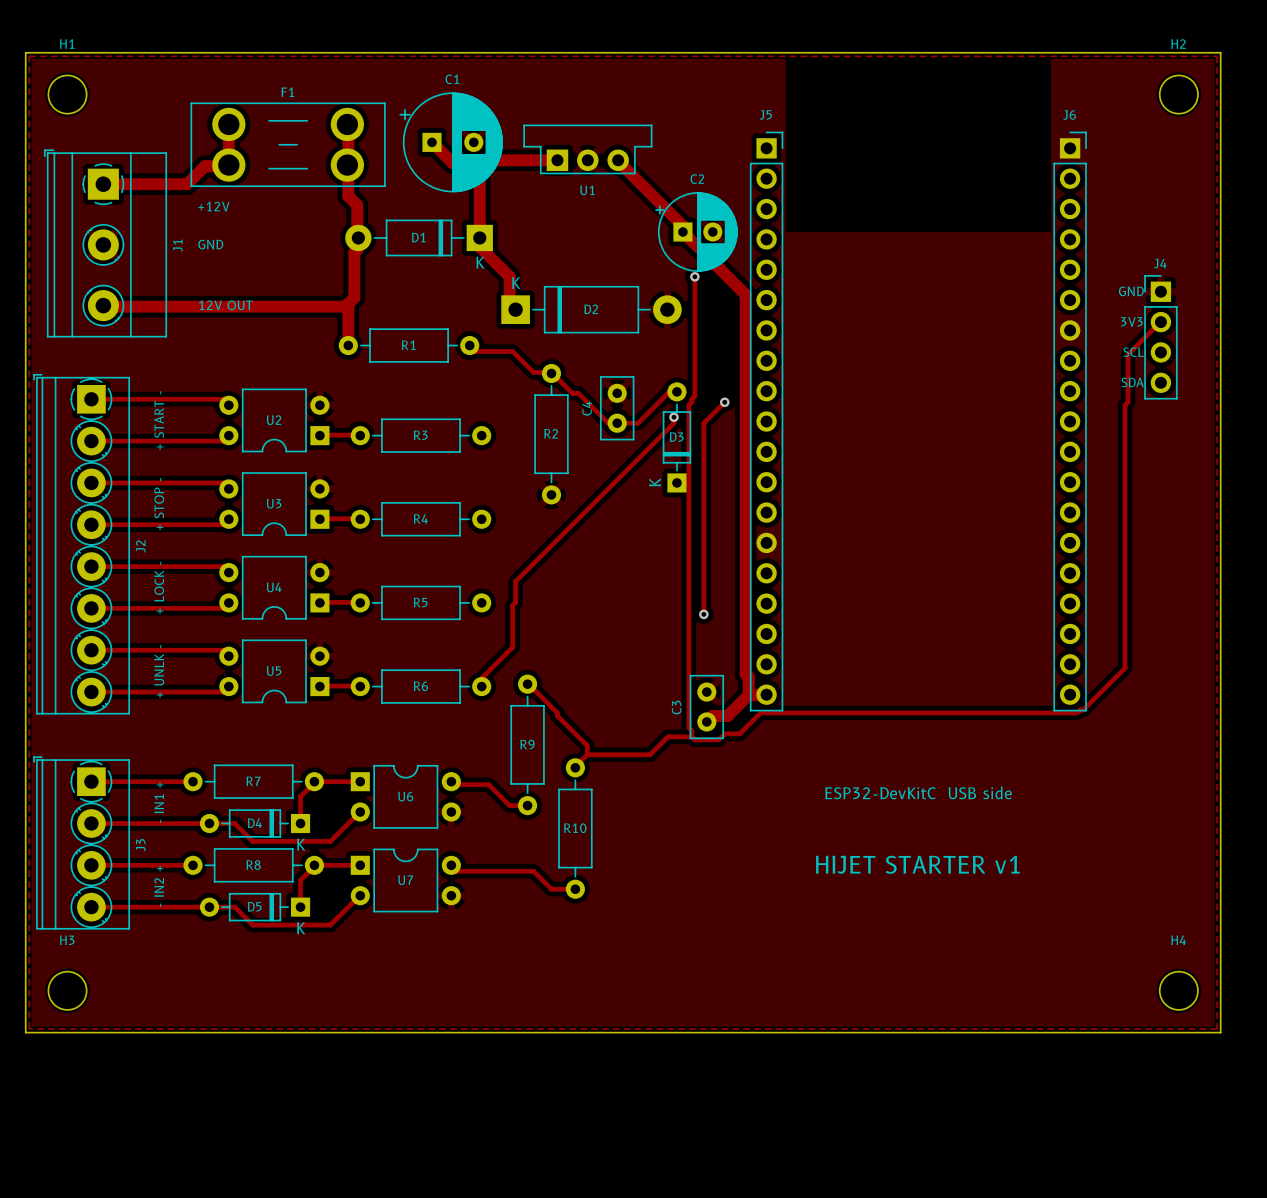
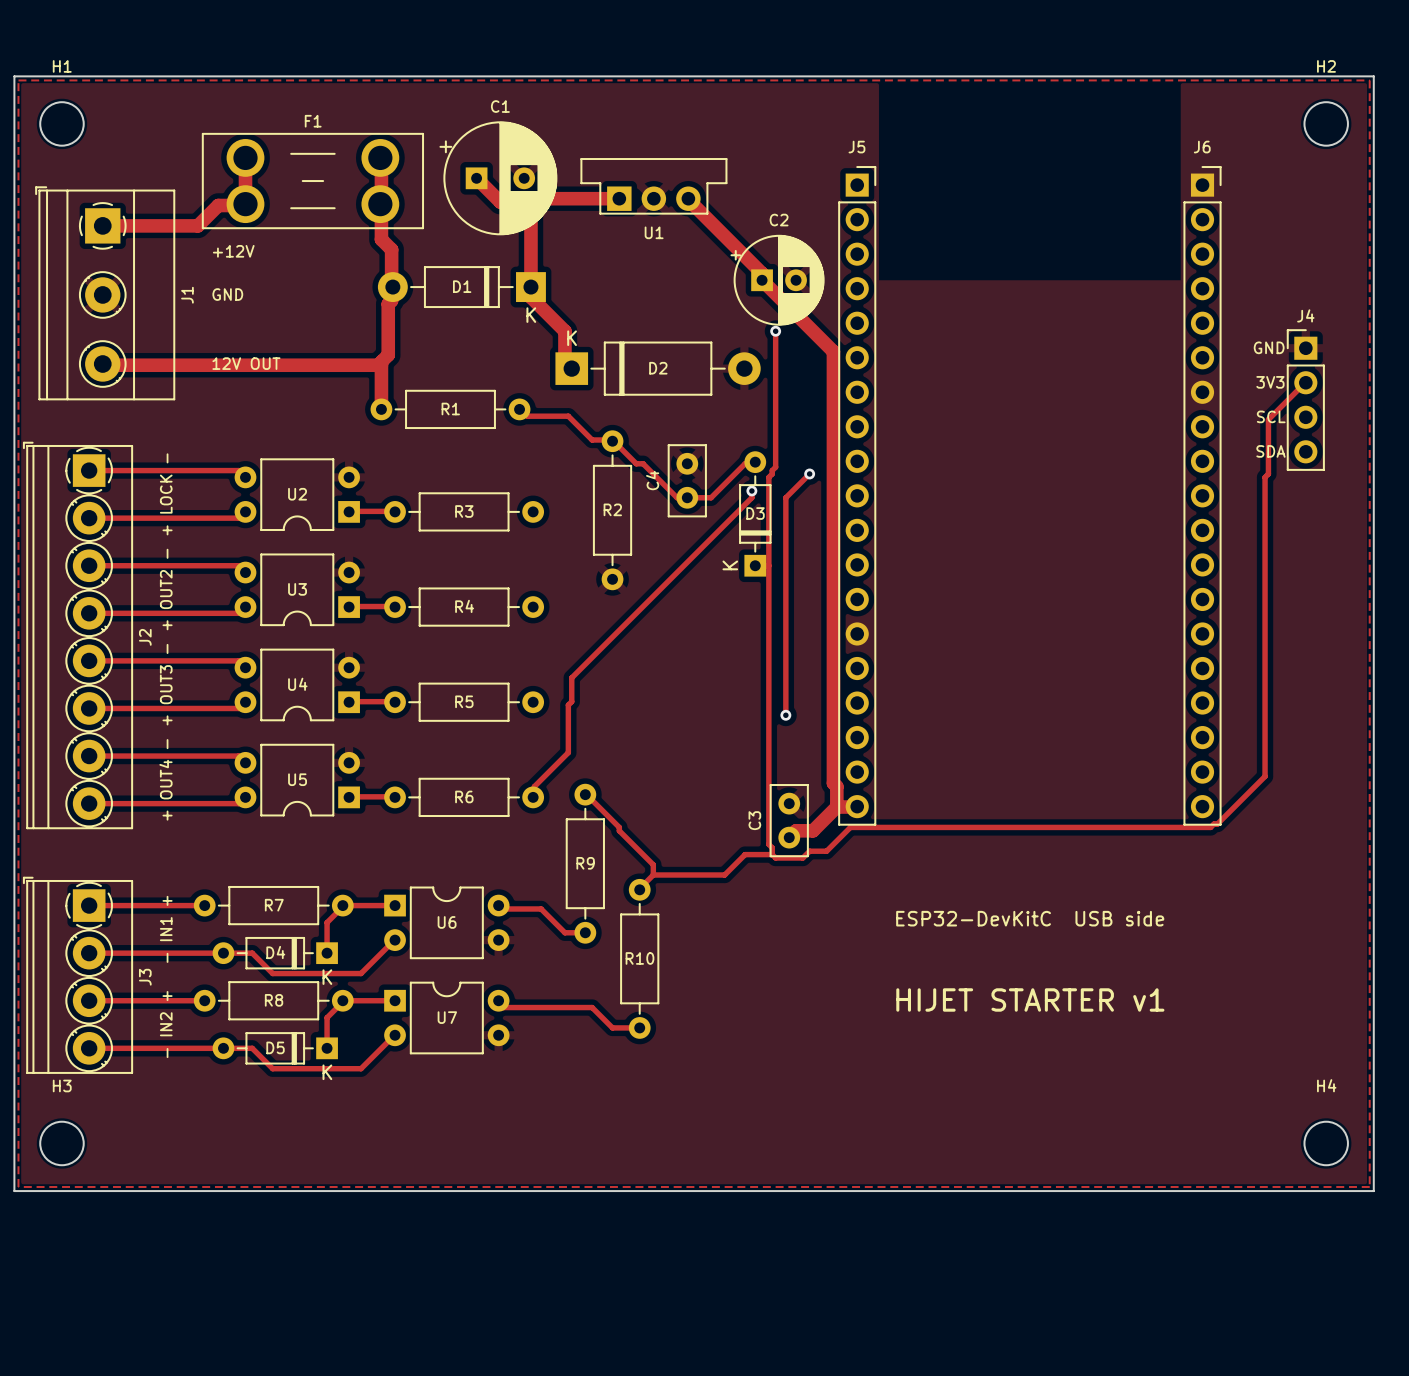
text: + START - (159, 420) -> + LOCK - (166, 494)
text: + STOP - (159, 504) -> + OUT2 - (166, 589)
text: + LOCK - (159, 587) -> + OUT3 - (166, 684)
text: + UNLK - (159, 671) -> + OUT4 - (165, 779)

